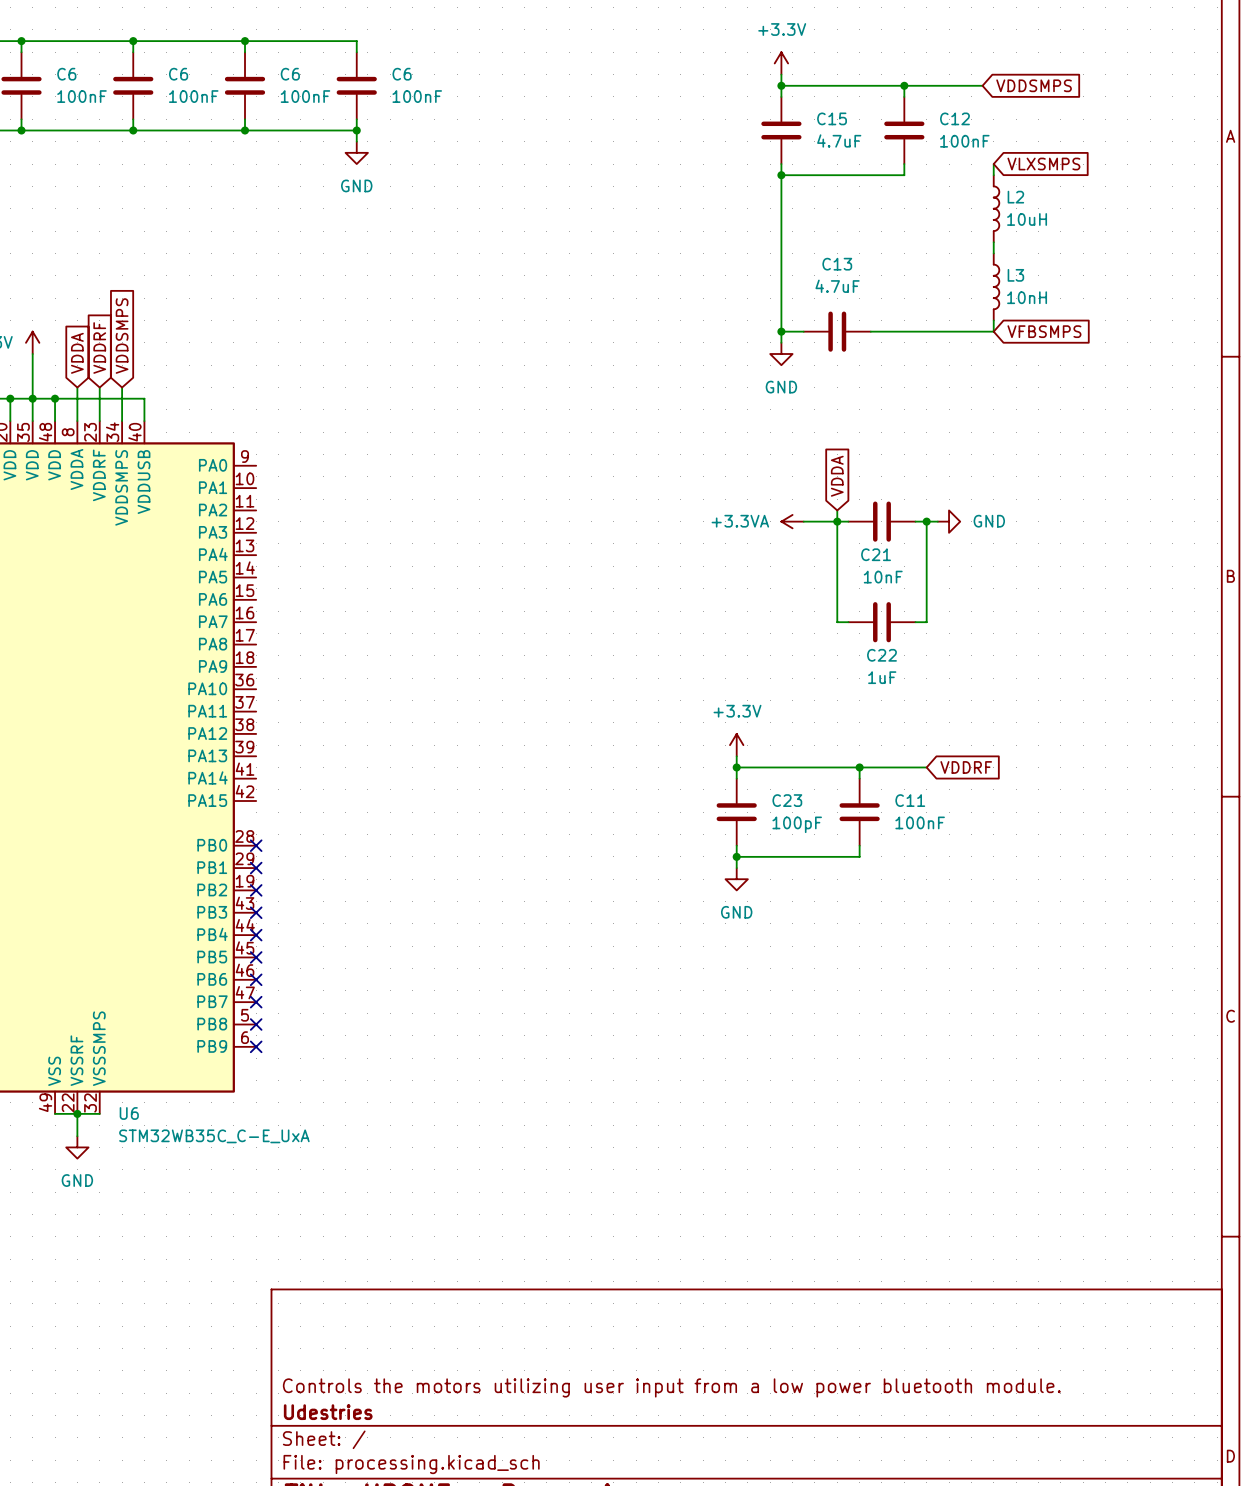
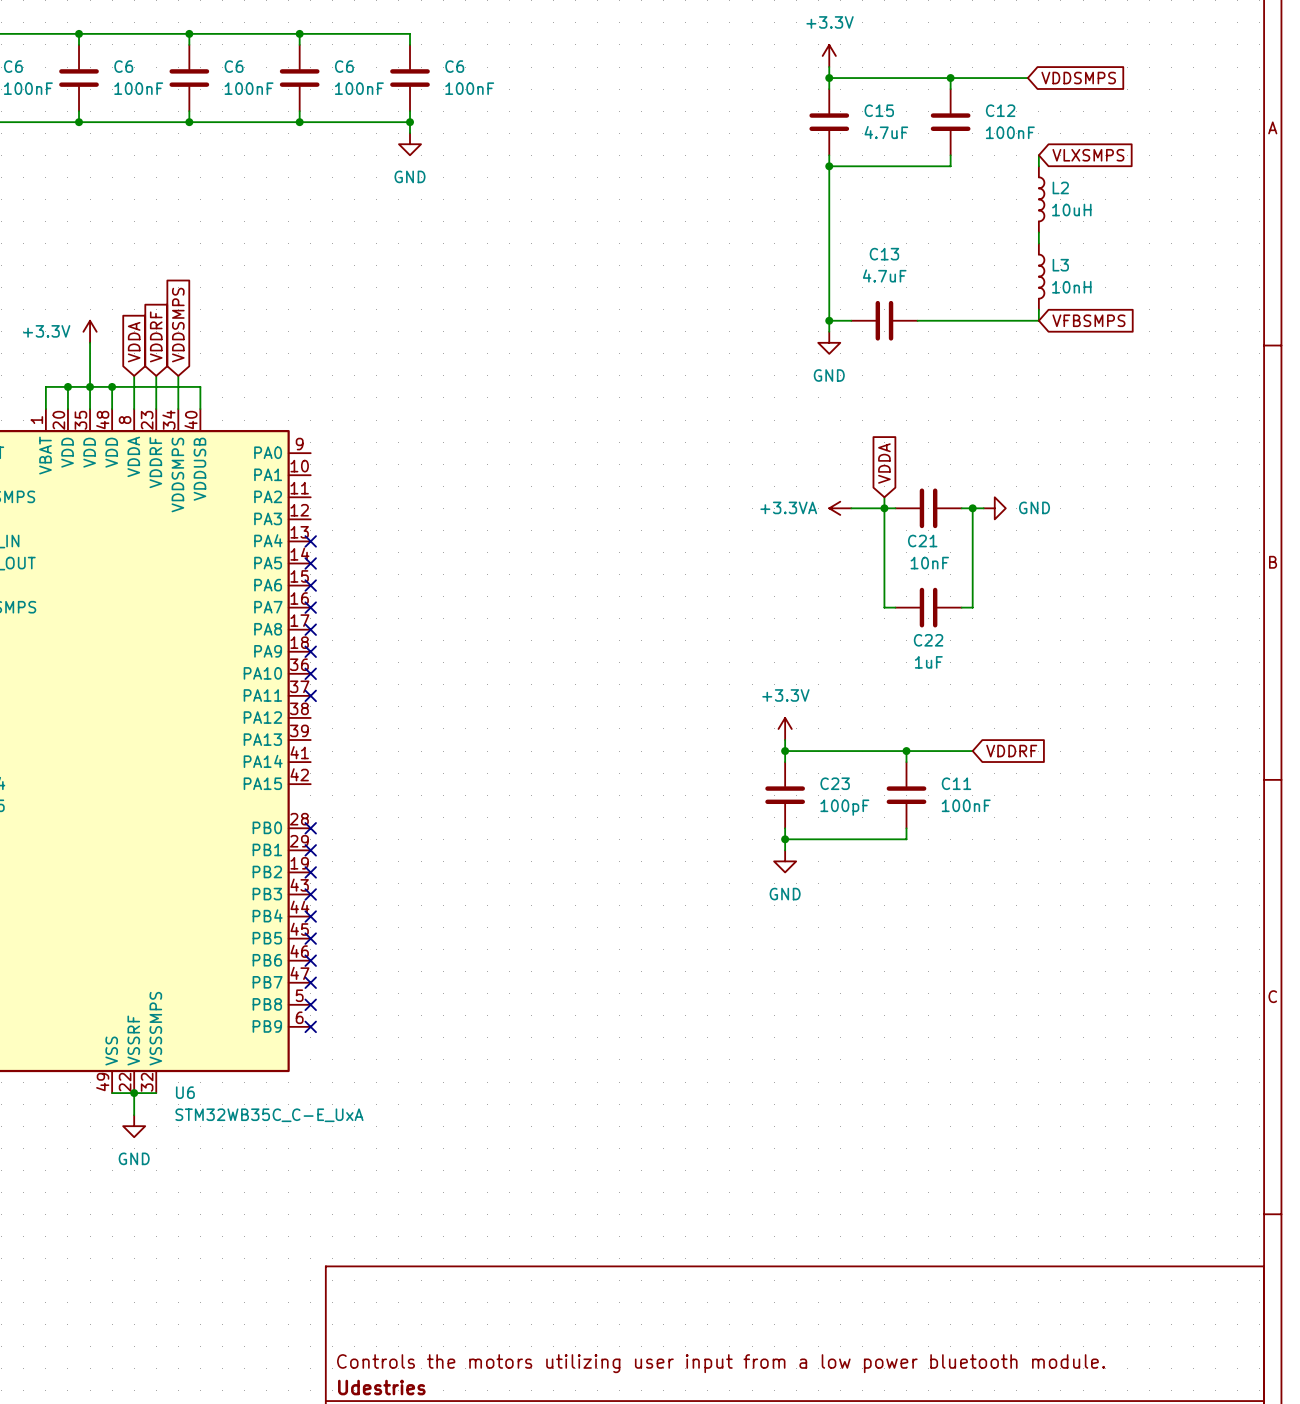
no-connect mark: none -> (310, 541)
no-connect mark: none -> (310, 563)
no-connect mark: none -> (310, 585)
no-connect mark: none -> (310, 607)
no-connect mark: none -> (310, 629)
no-connect mark: none -> (310, 651)
no-connect mark: none -> (310, 673)
no-connect mark: none -> (310, 695)

